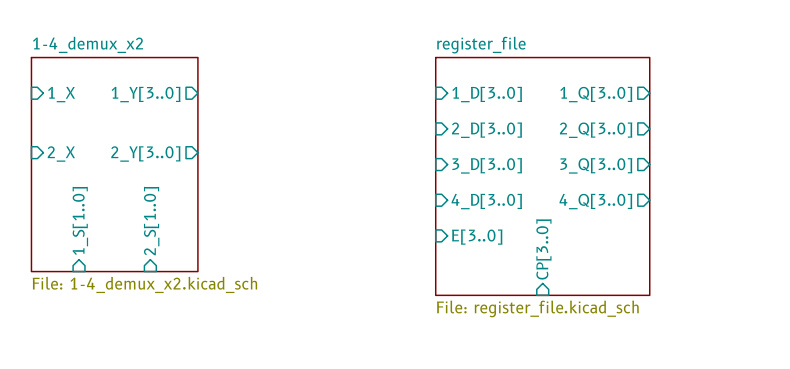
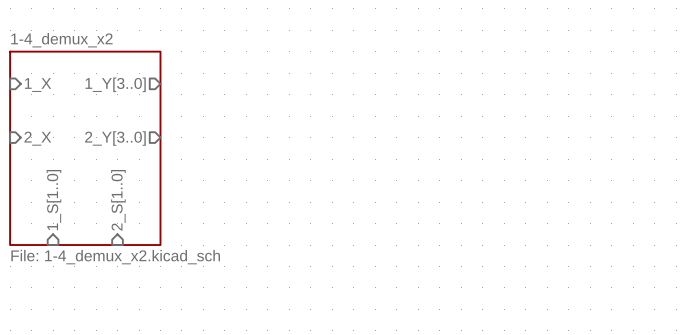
sheet pin: 1_D[3..0] (487, 94) -> none
sheet pin: 1_Q[3..0] (596, 94) -> none
sheet pin: 2_D[3..0] (487, 130) -> none
sheet pin: 2_Q[3..0] (596, 130) -> none
sheet pin: 3_D[3..0] (487, 165) -> none
sheet pin: 3_Q[3..0] (596, 165) -> none
sheet register_file: File: register_file.kicad_sch (542, 176) -> none
sheet pin: 4_D[3..0] (486, 201) -> none
sheet pin: 4_Q[3..0] (595, 201) -> none
sheet pin: E[3..0] (477, 237) -> none
sheet pin: CP[3..0] (543, 249) -> none

